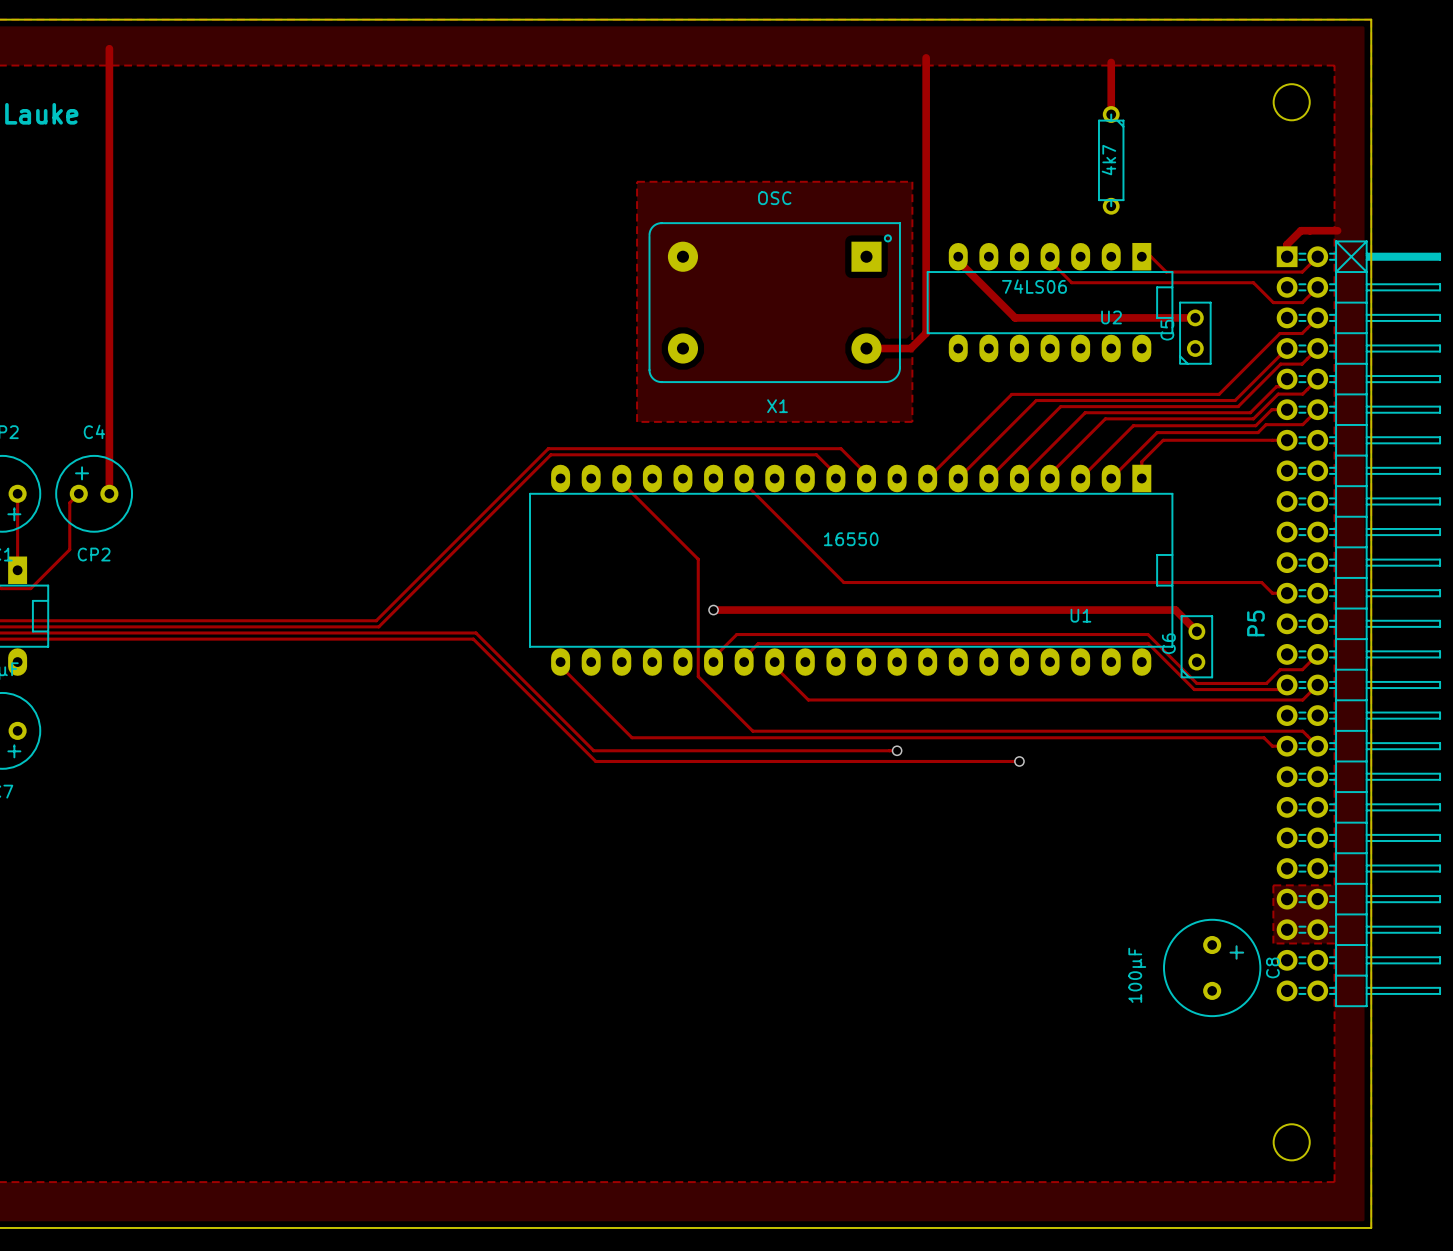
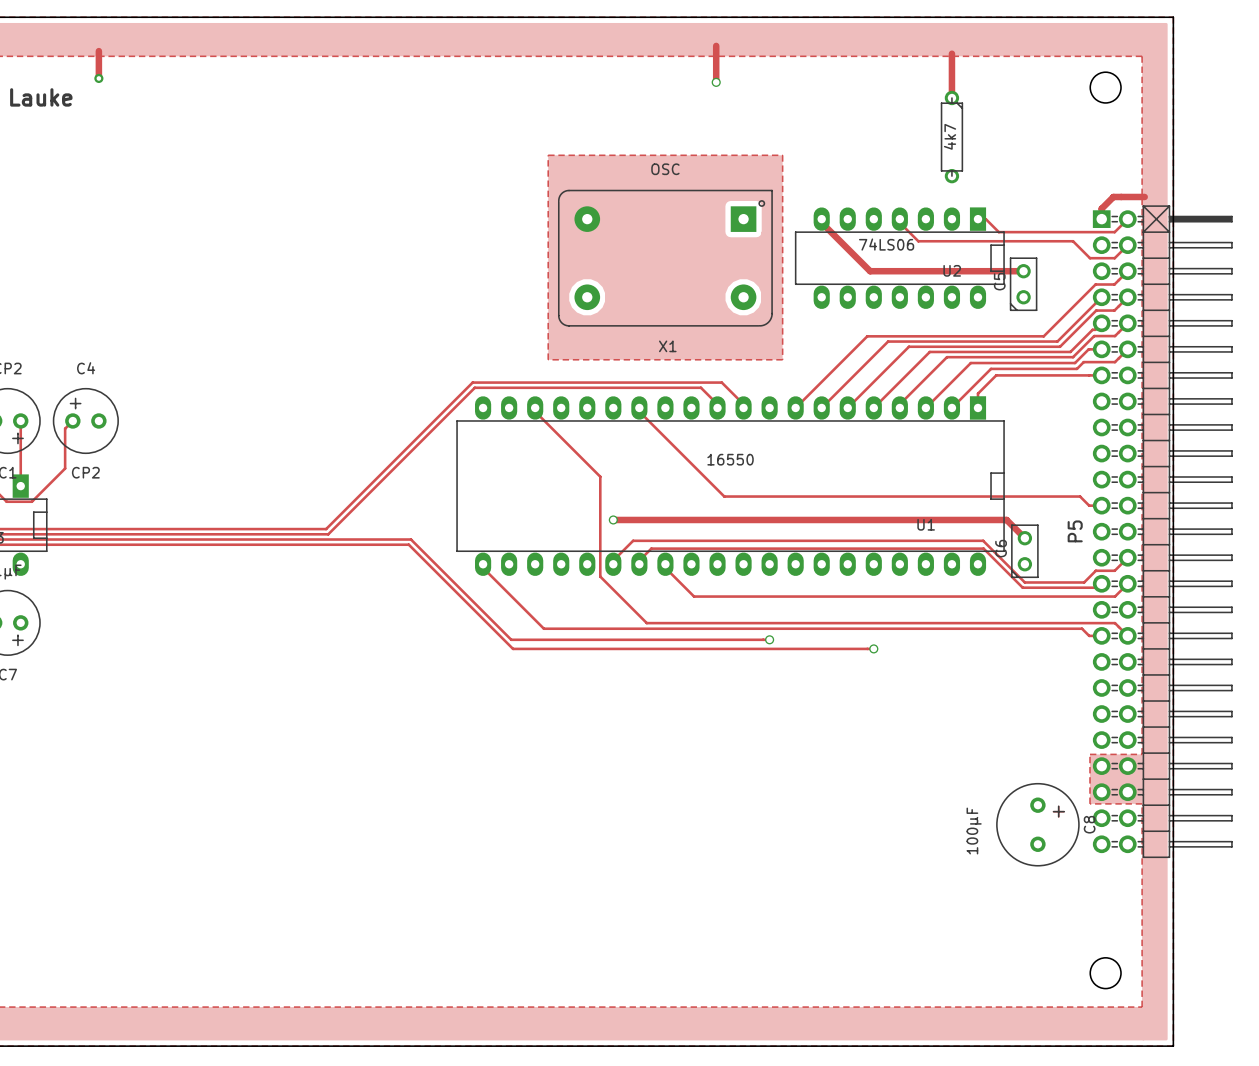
track: (109, 48) (109, 59) -> none
track: none -> (716, 45) (716, 82)
track: (926, 57) (926, 333) (910, 348) (866, 348) -> none
track: (109, 91) (109, 493) -> none
via: none -> (98, 78)
via: none -> (716, 82)

